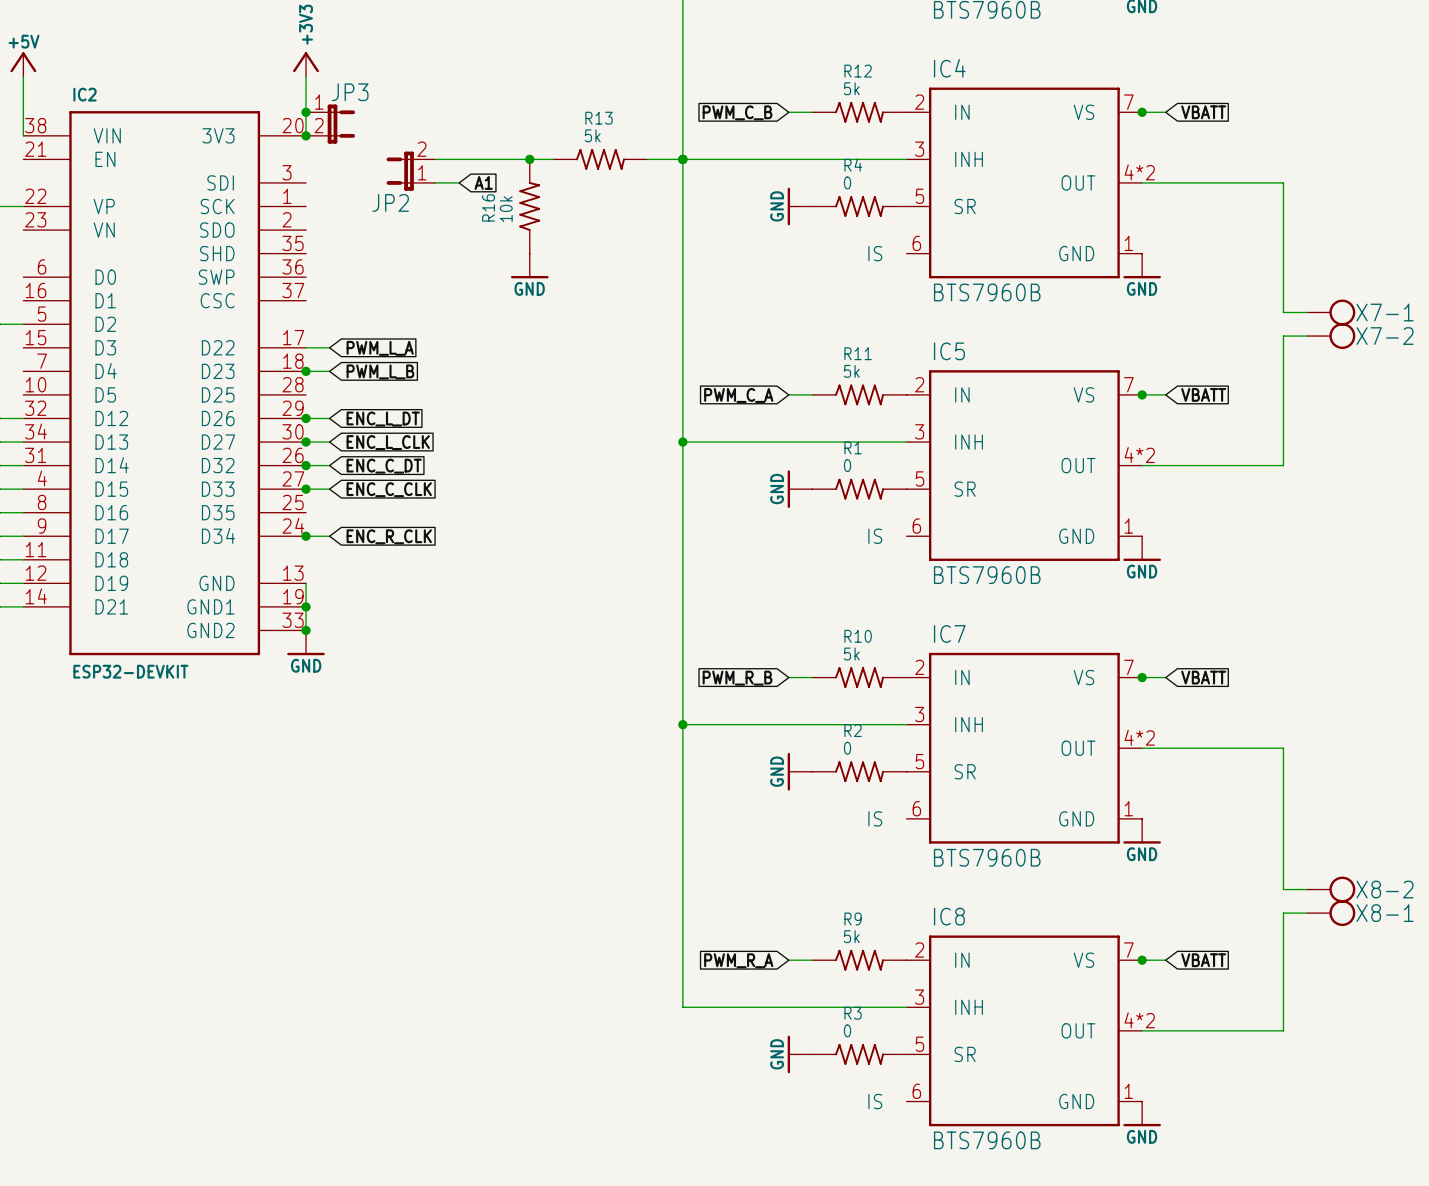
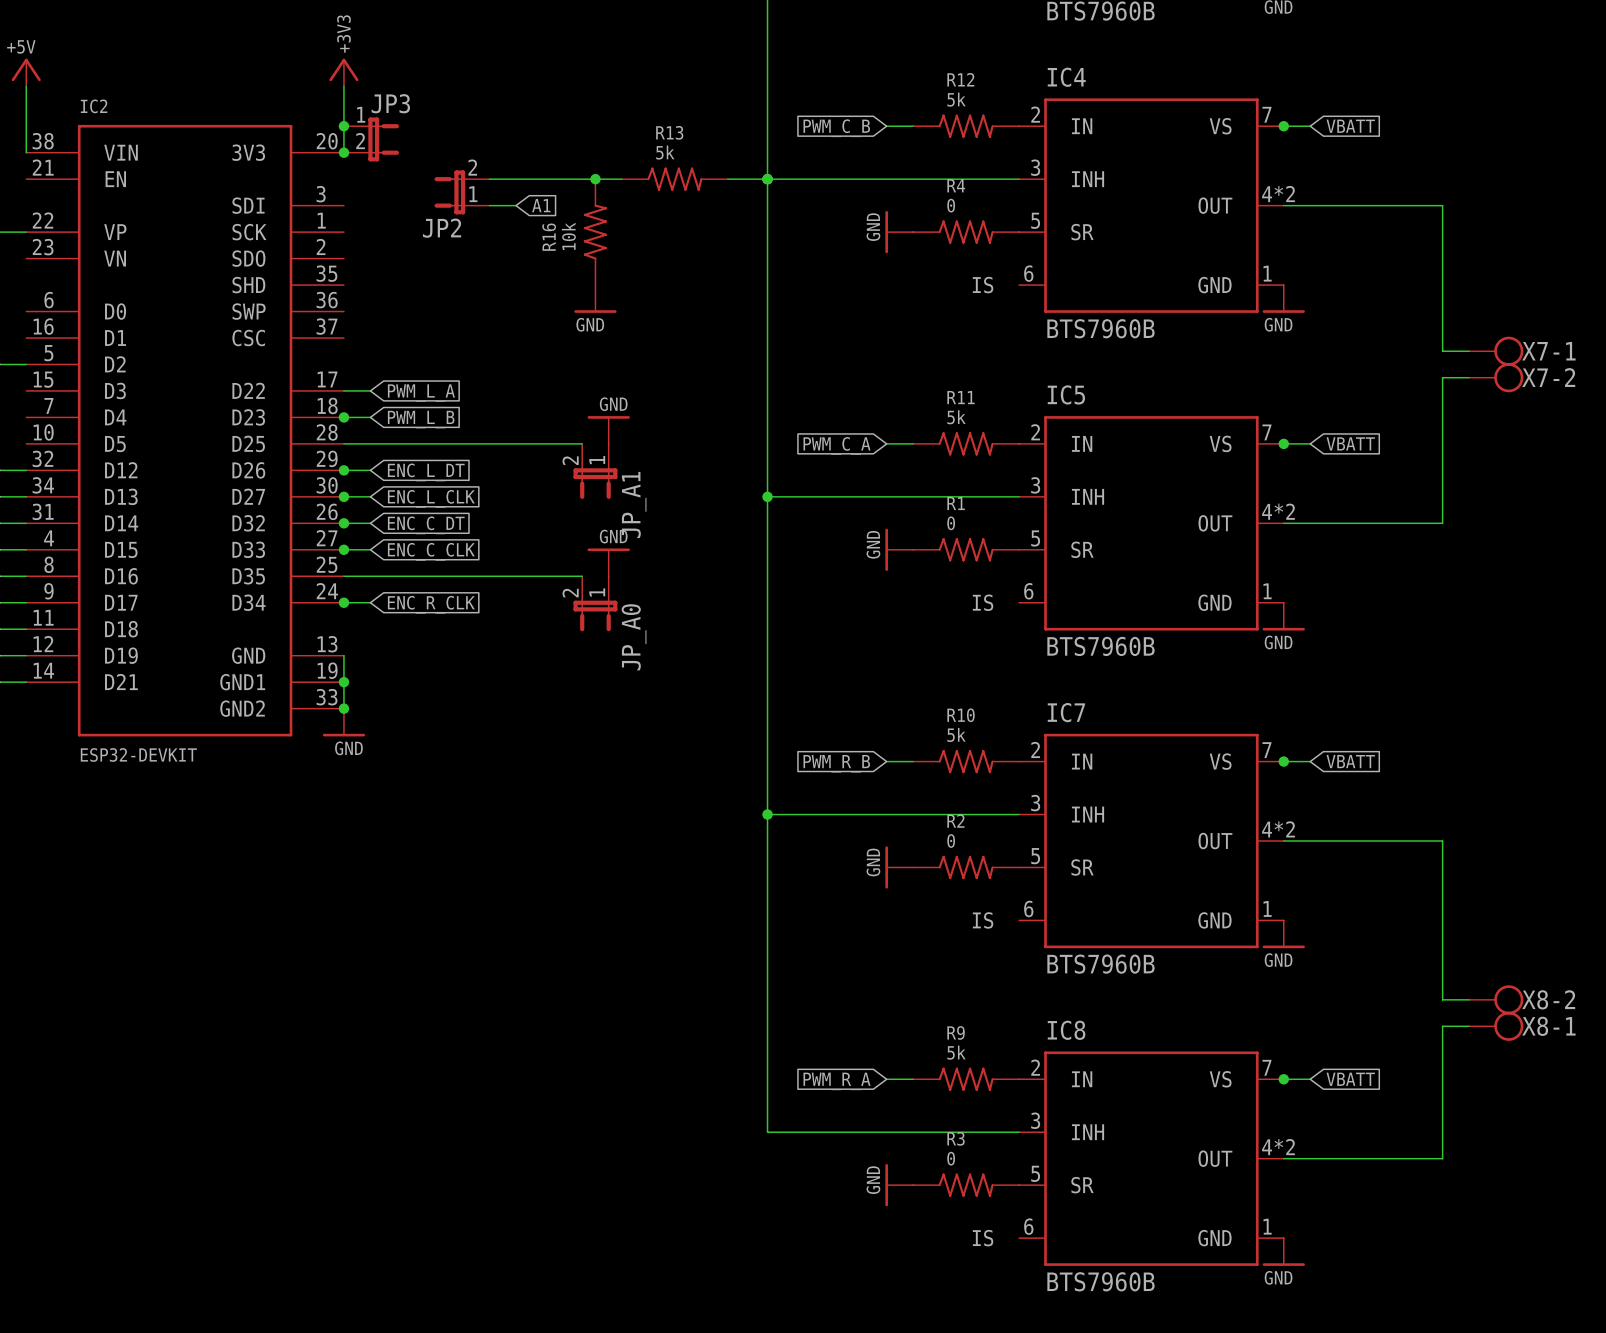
power symbol: none -> GND (608, 430)
wire: none -> (343, 443) (582, 443)
JP_A1: none -> (595, 471)
power symbol: none -> GND (608, 562)
wire: none -> (343, 576) (582, 576)
JP_A0: none -> (595, 603)

